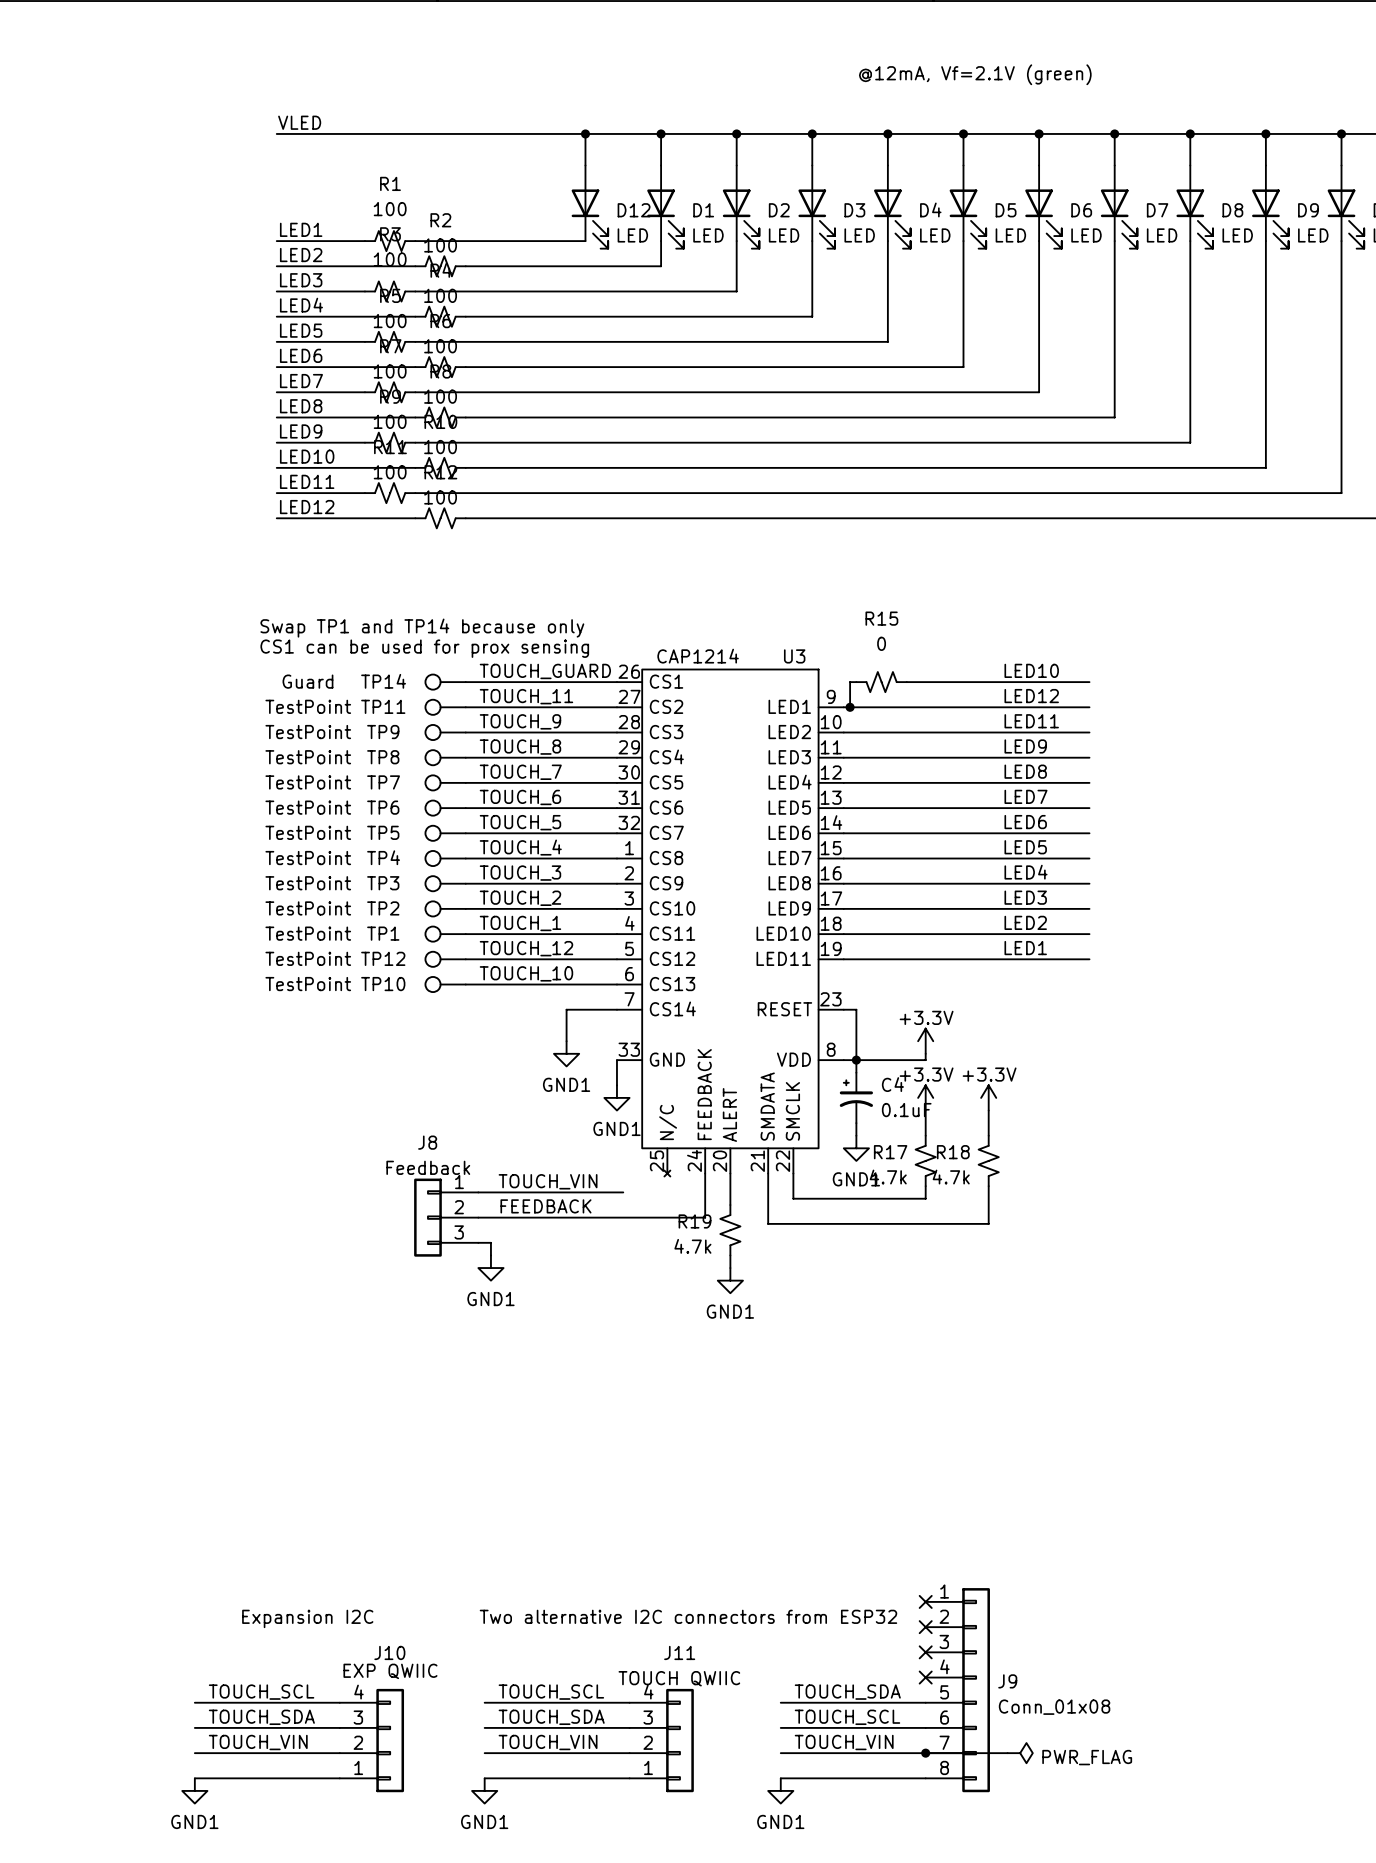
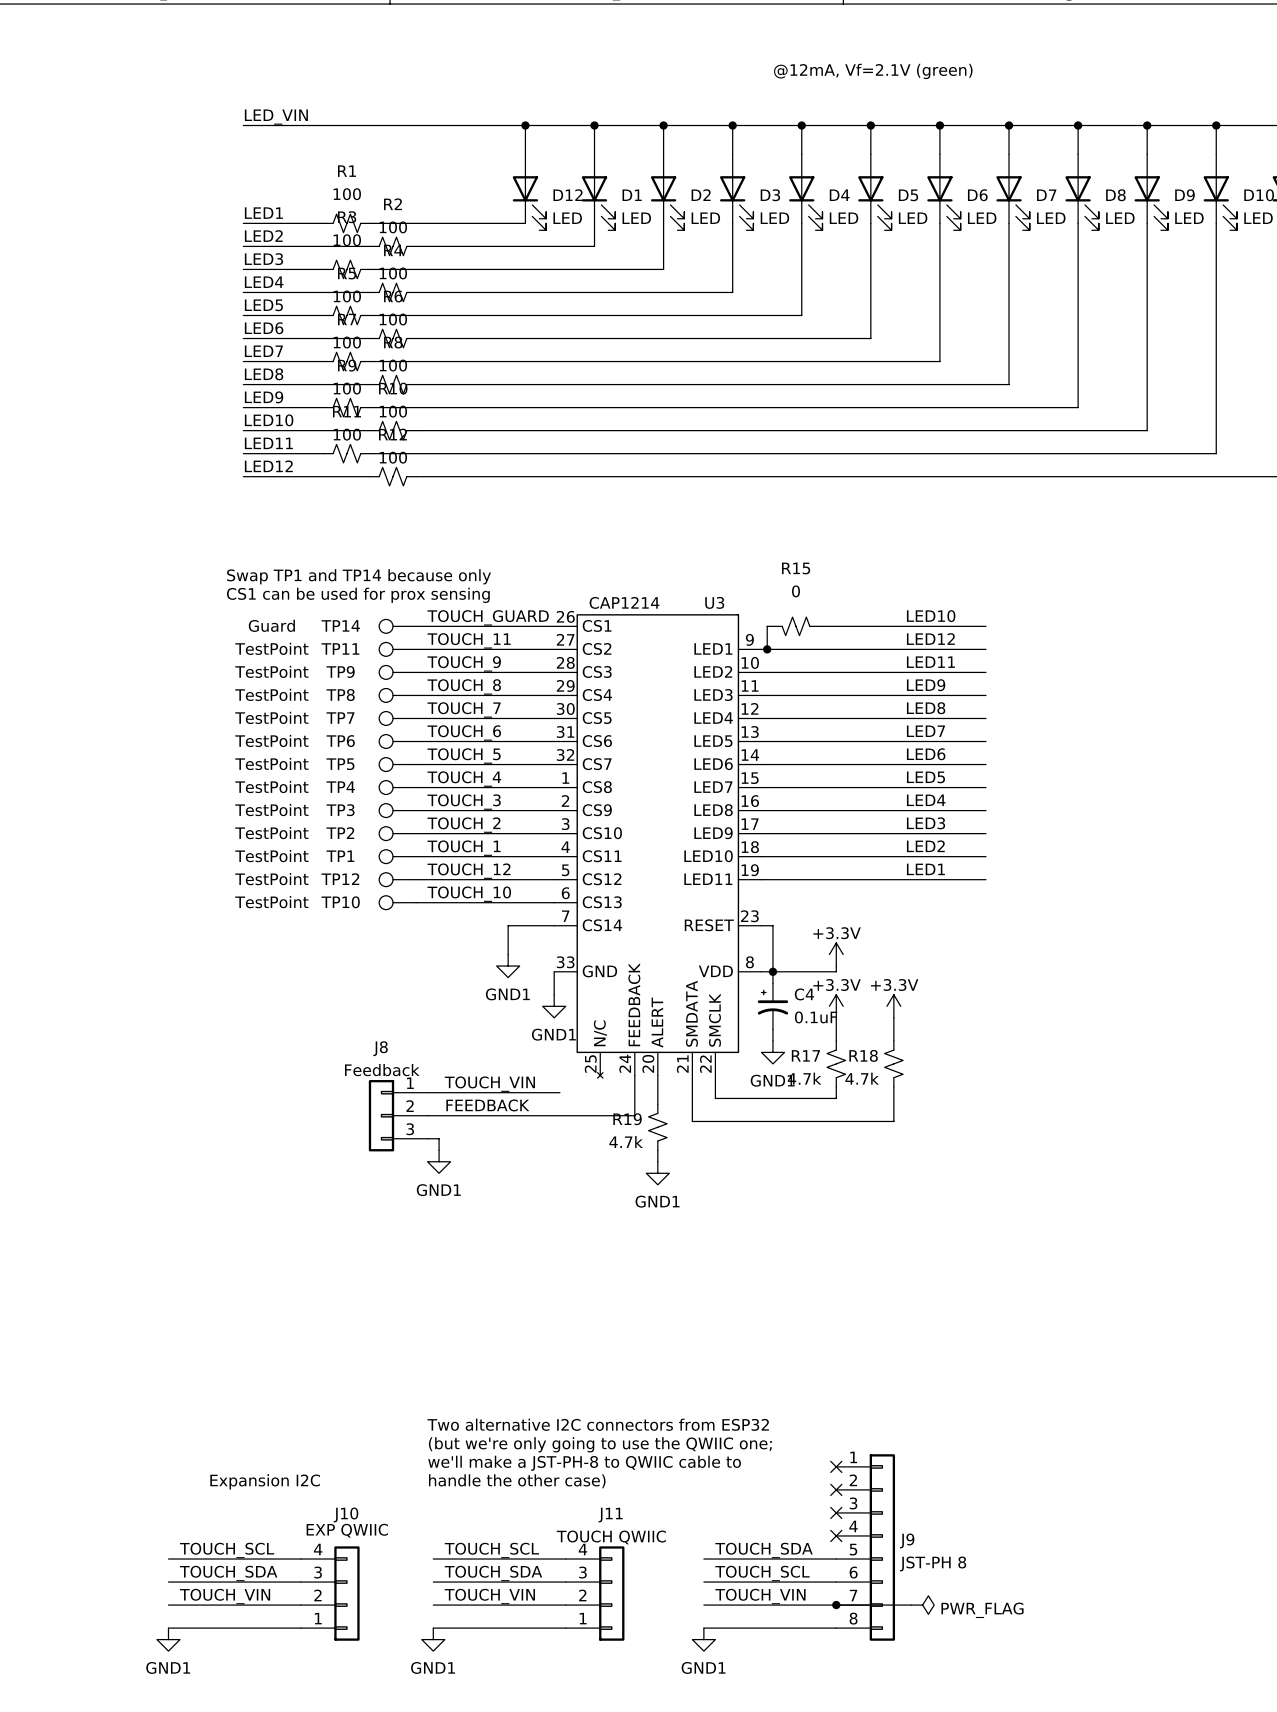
label: VLED (299, 122) -> LED_VIN (276, 117)
text: none -> Two alternative I2C connectors from ESP32 (598, 1424)
text: none -> (but we're only going to use the QWIIC one; (600, 1444)
text: none -> we'll make a JST-PH-8 to QWIIC cable to (584, 1463)
text: Two alternative I2C connectors from ESP32 (688, 1616) -> handle the other case) (517, 1481)
J9 value: Conn_01x08 (1054, 1707) -> JST-PH 8 (933, 1563)

